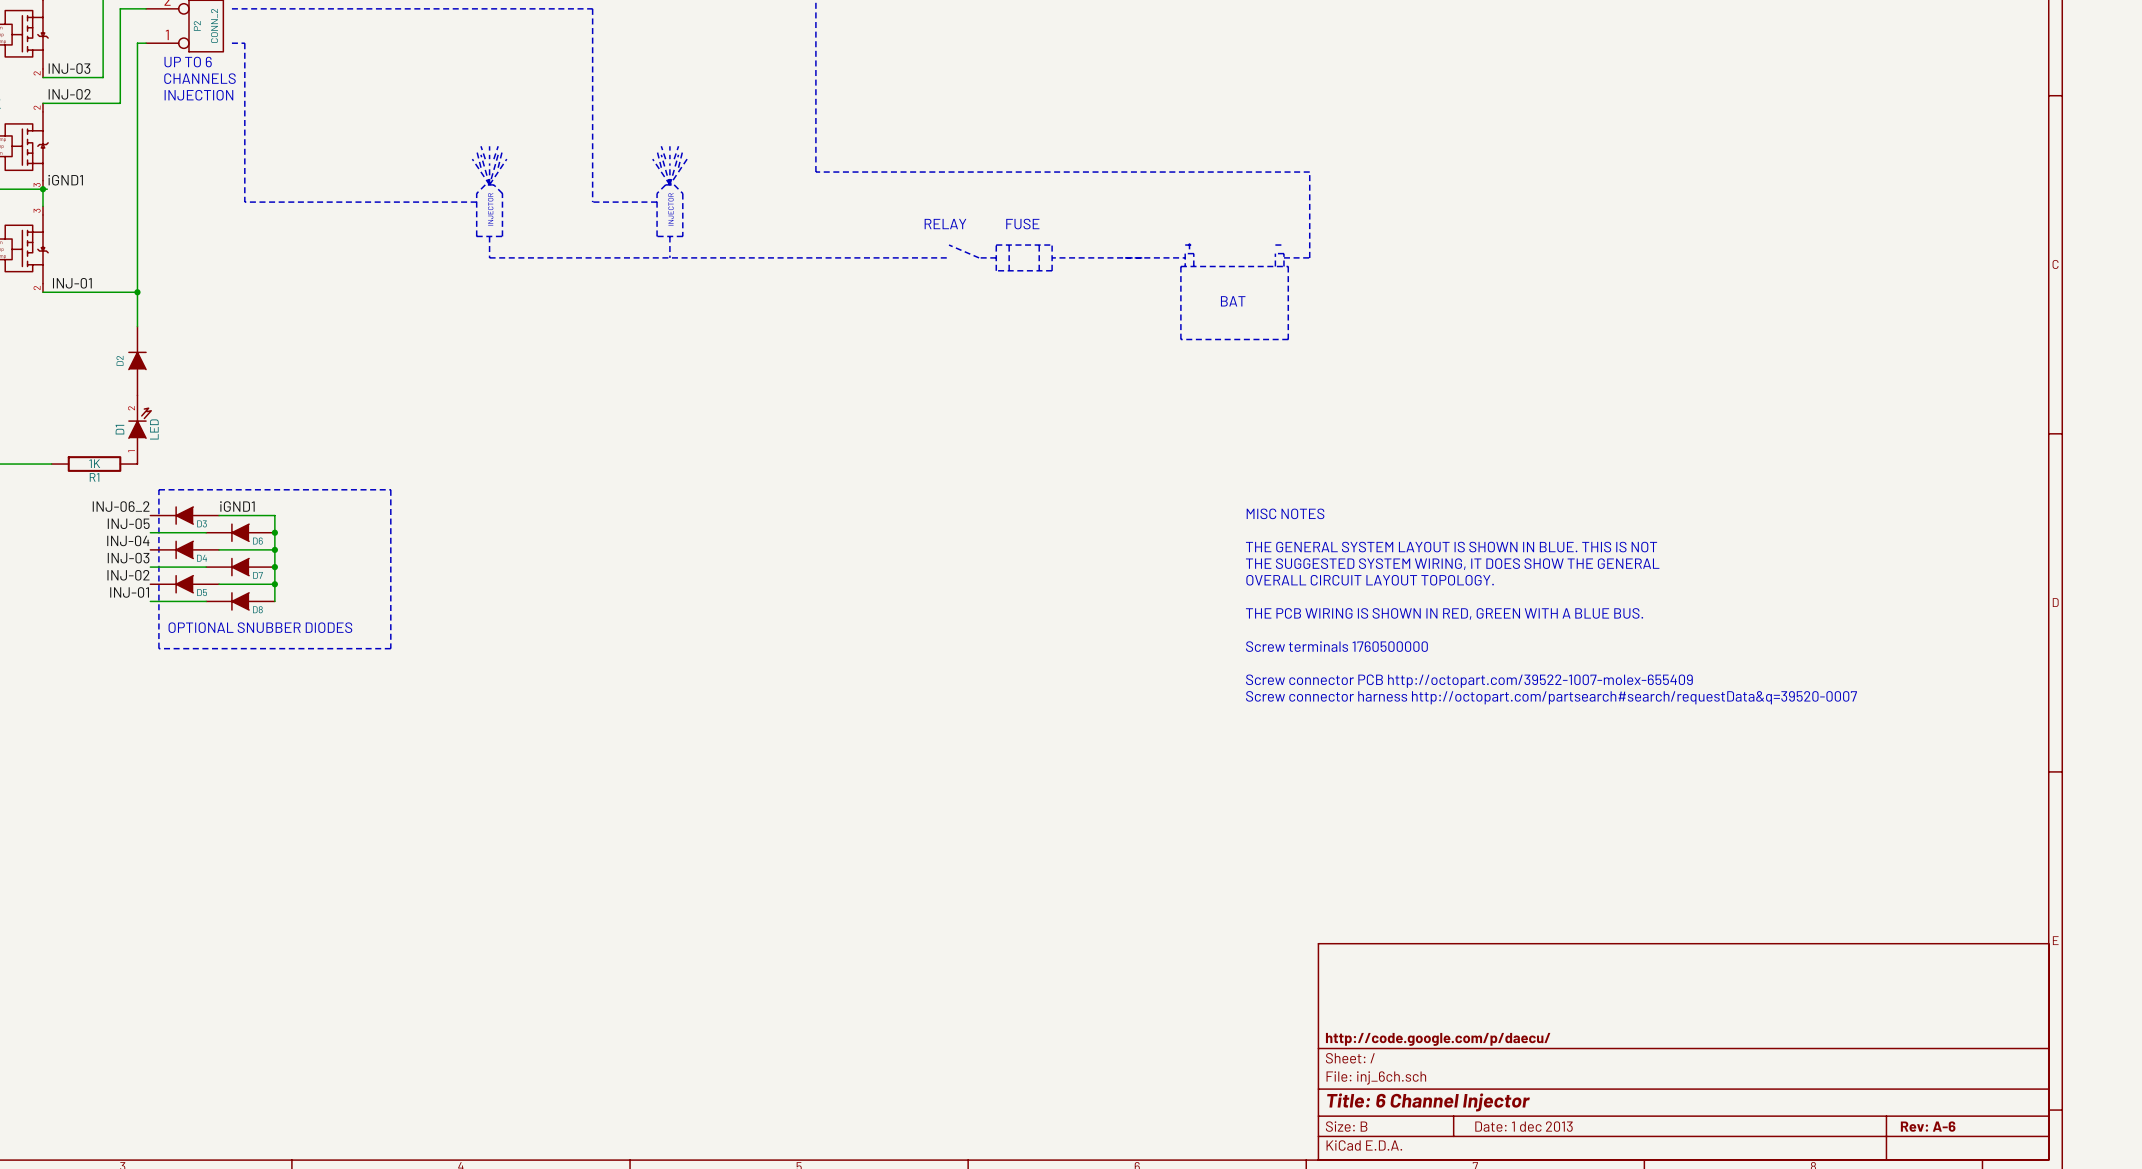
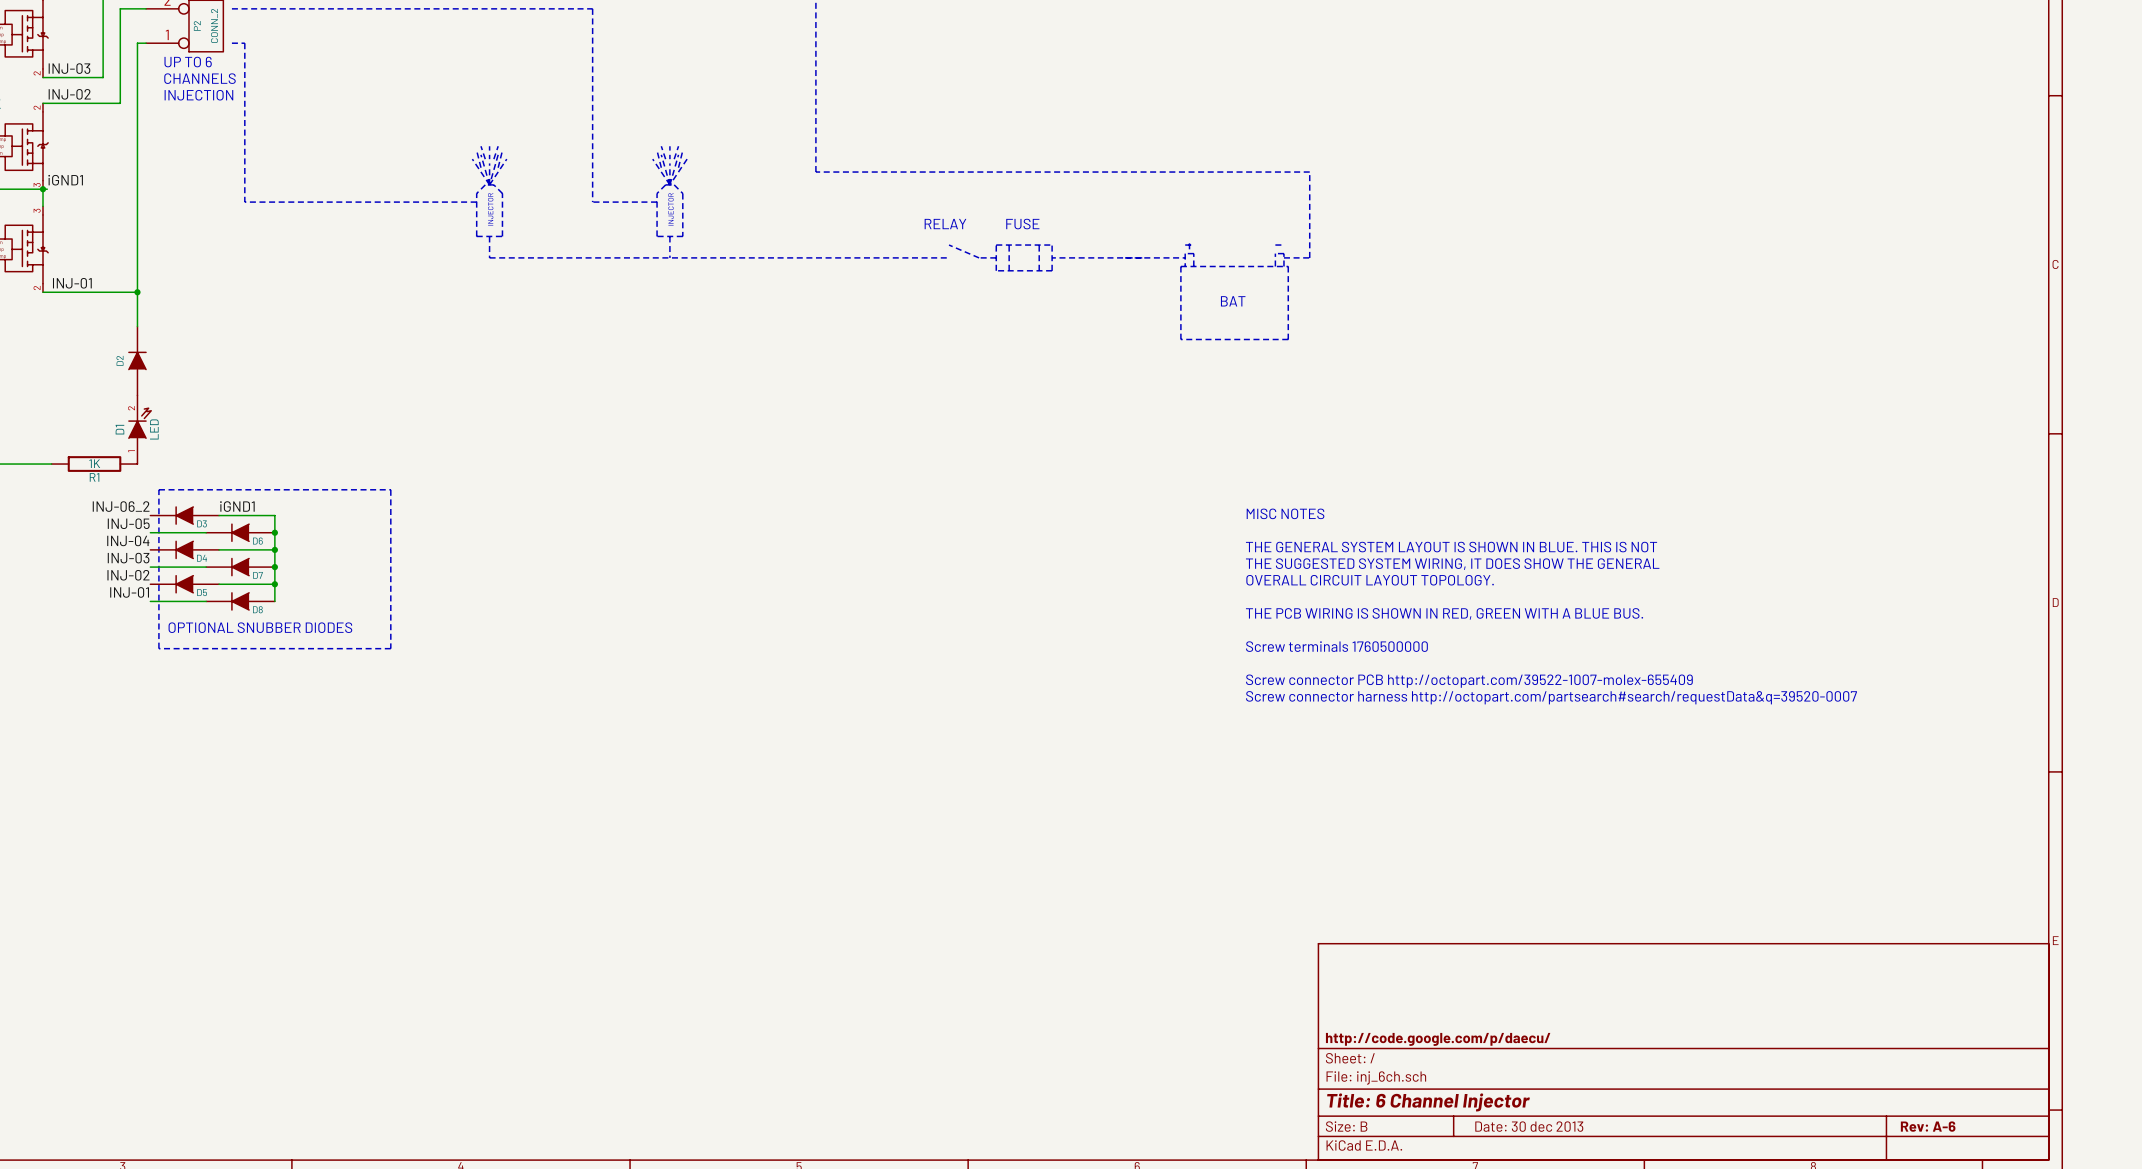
title block: Date: 1 dec 2013 (1524, 1126) -> Date: 30 dec 2013 (1529, 1126)

